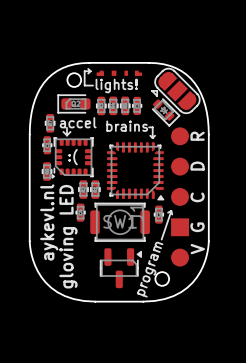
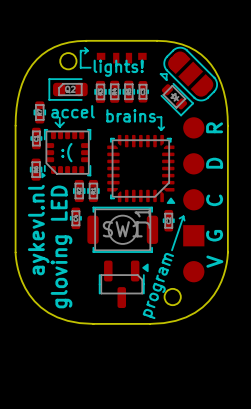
part footprint: [96, 70, 142, 76] -> [96, 52, 147, 64]

